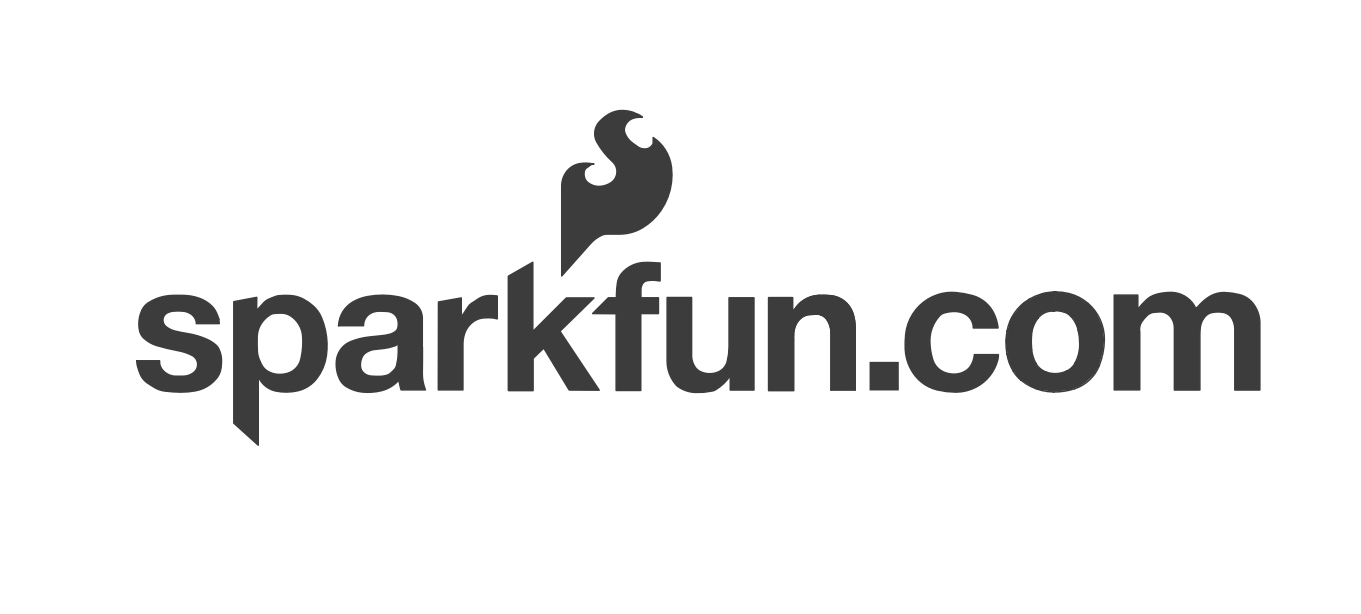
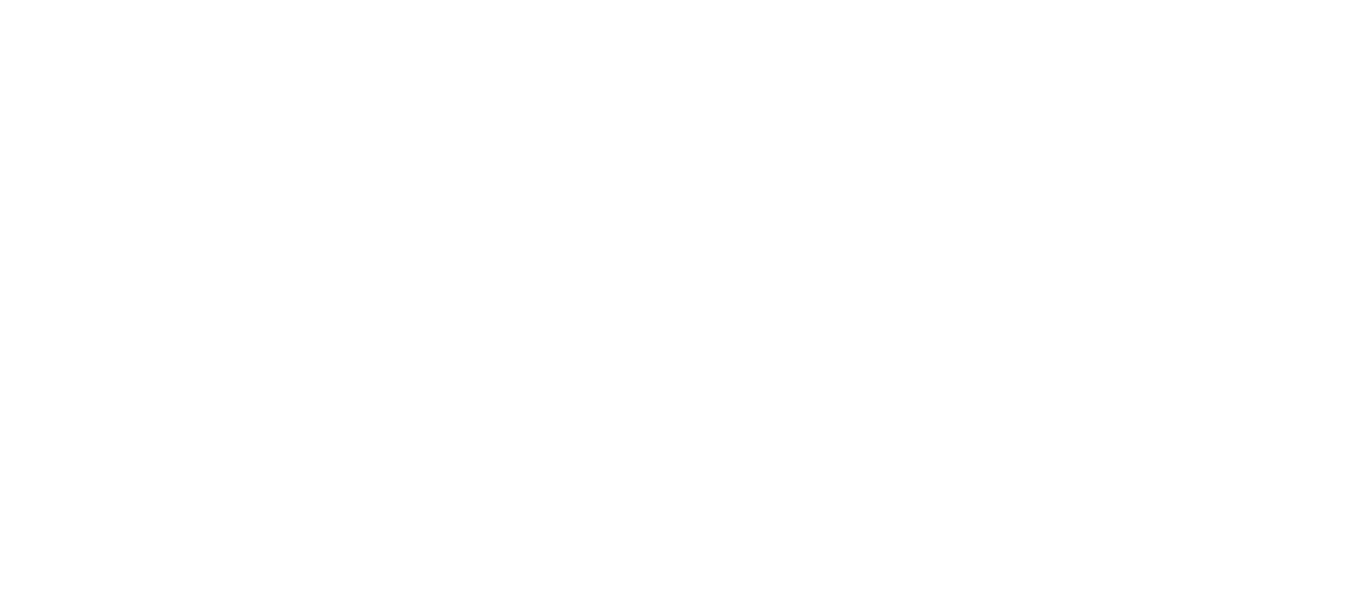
drawing: [136, 109, 1261, 446] -> none

